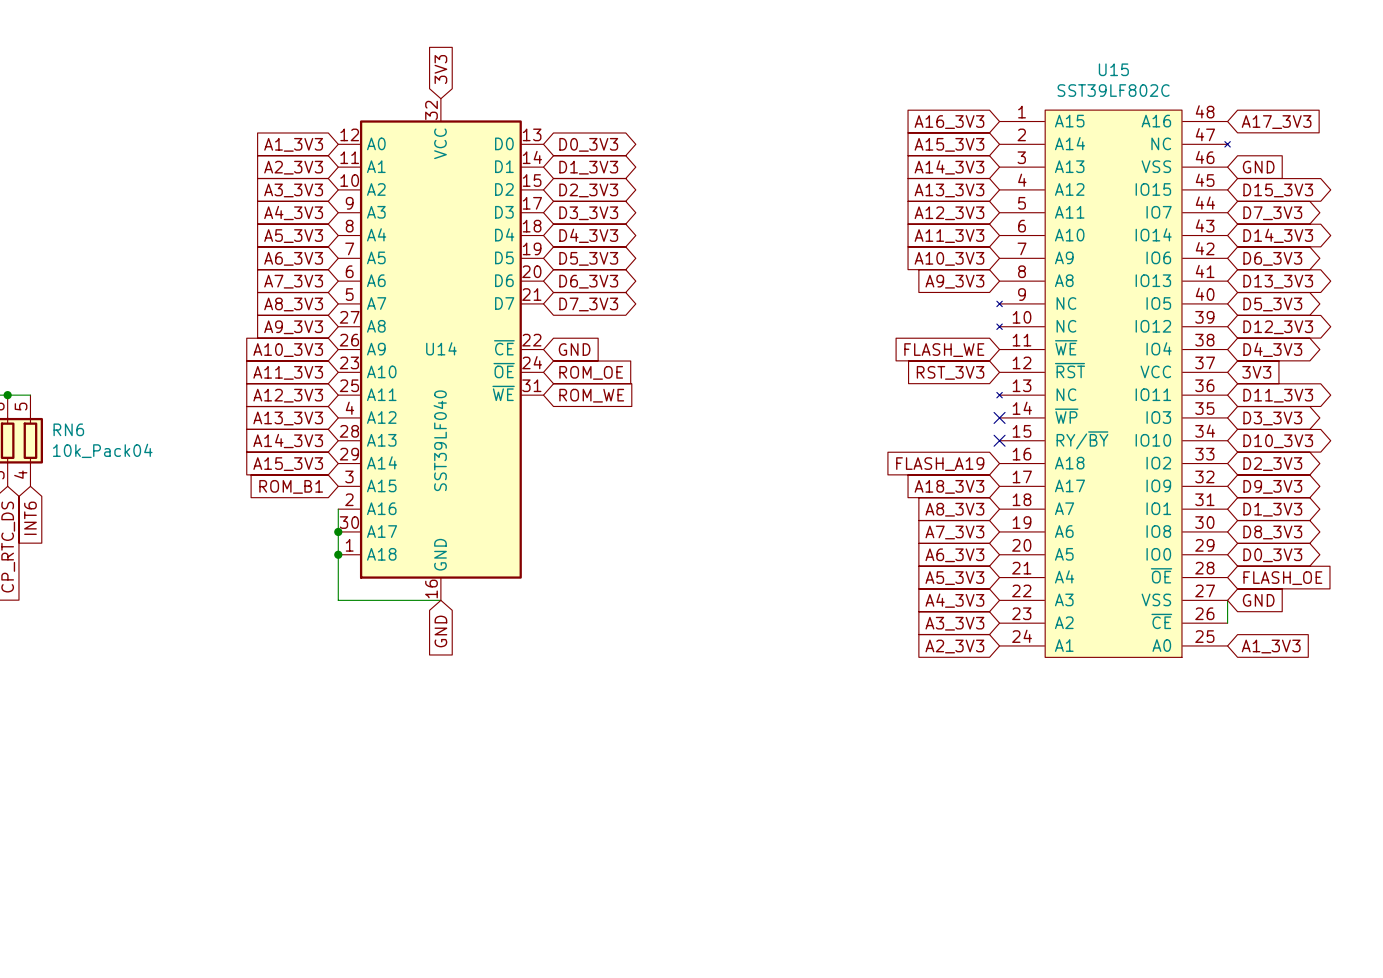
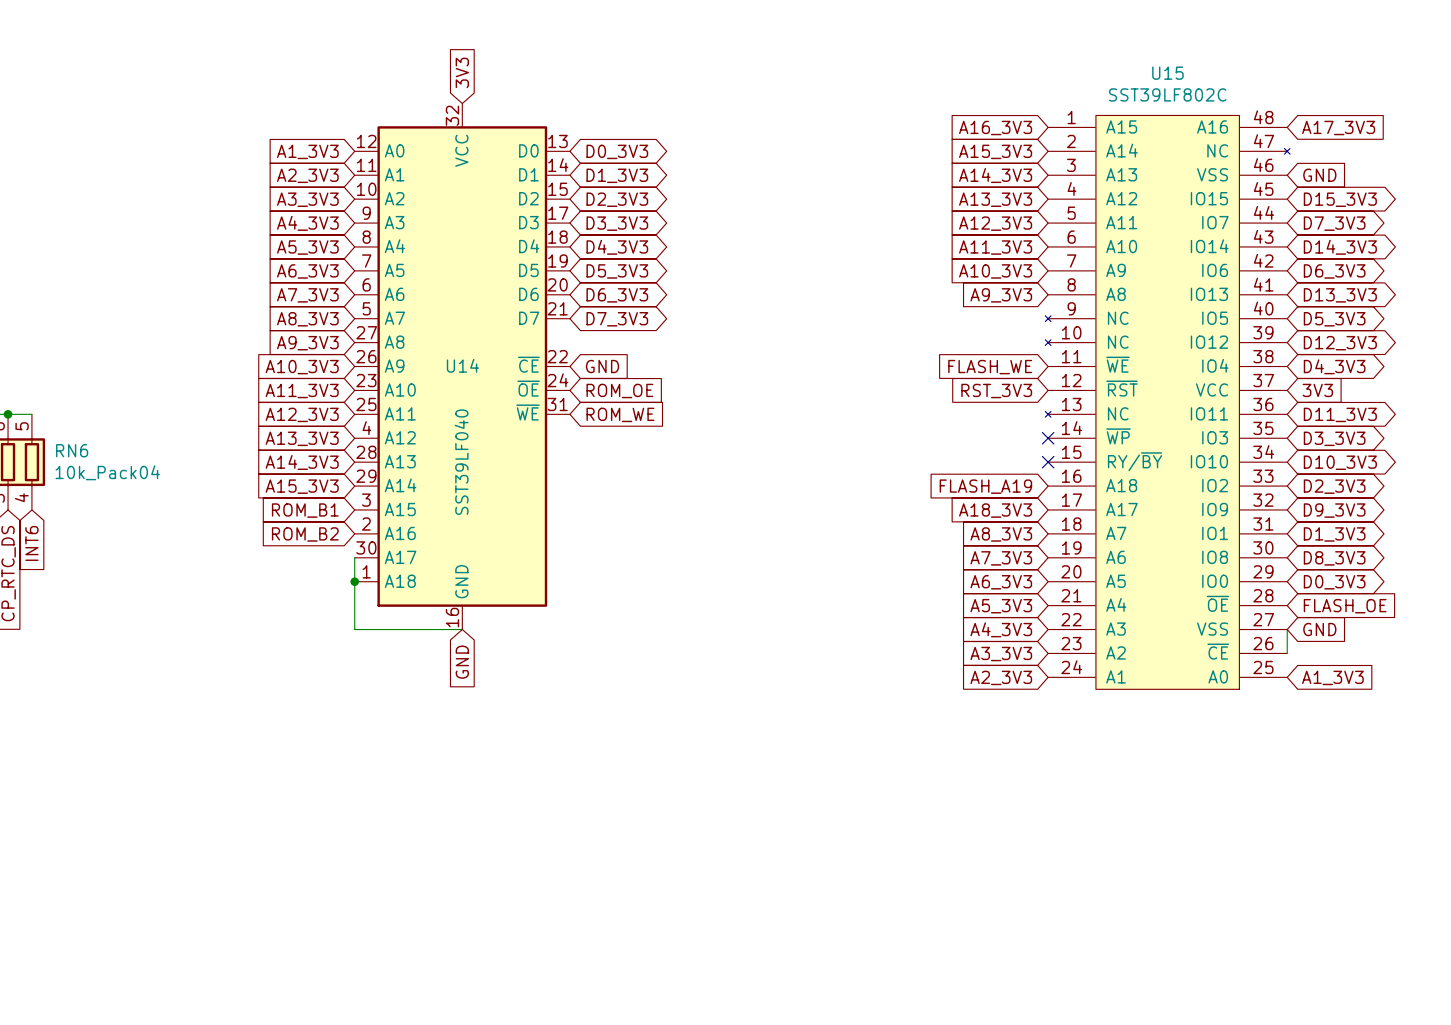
global label: none -> ROM_B2 (305, 534)
wire: (338, 509) (338, 531) -> none
junction: (338, 531) -> none

